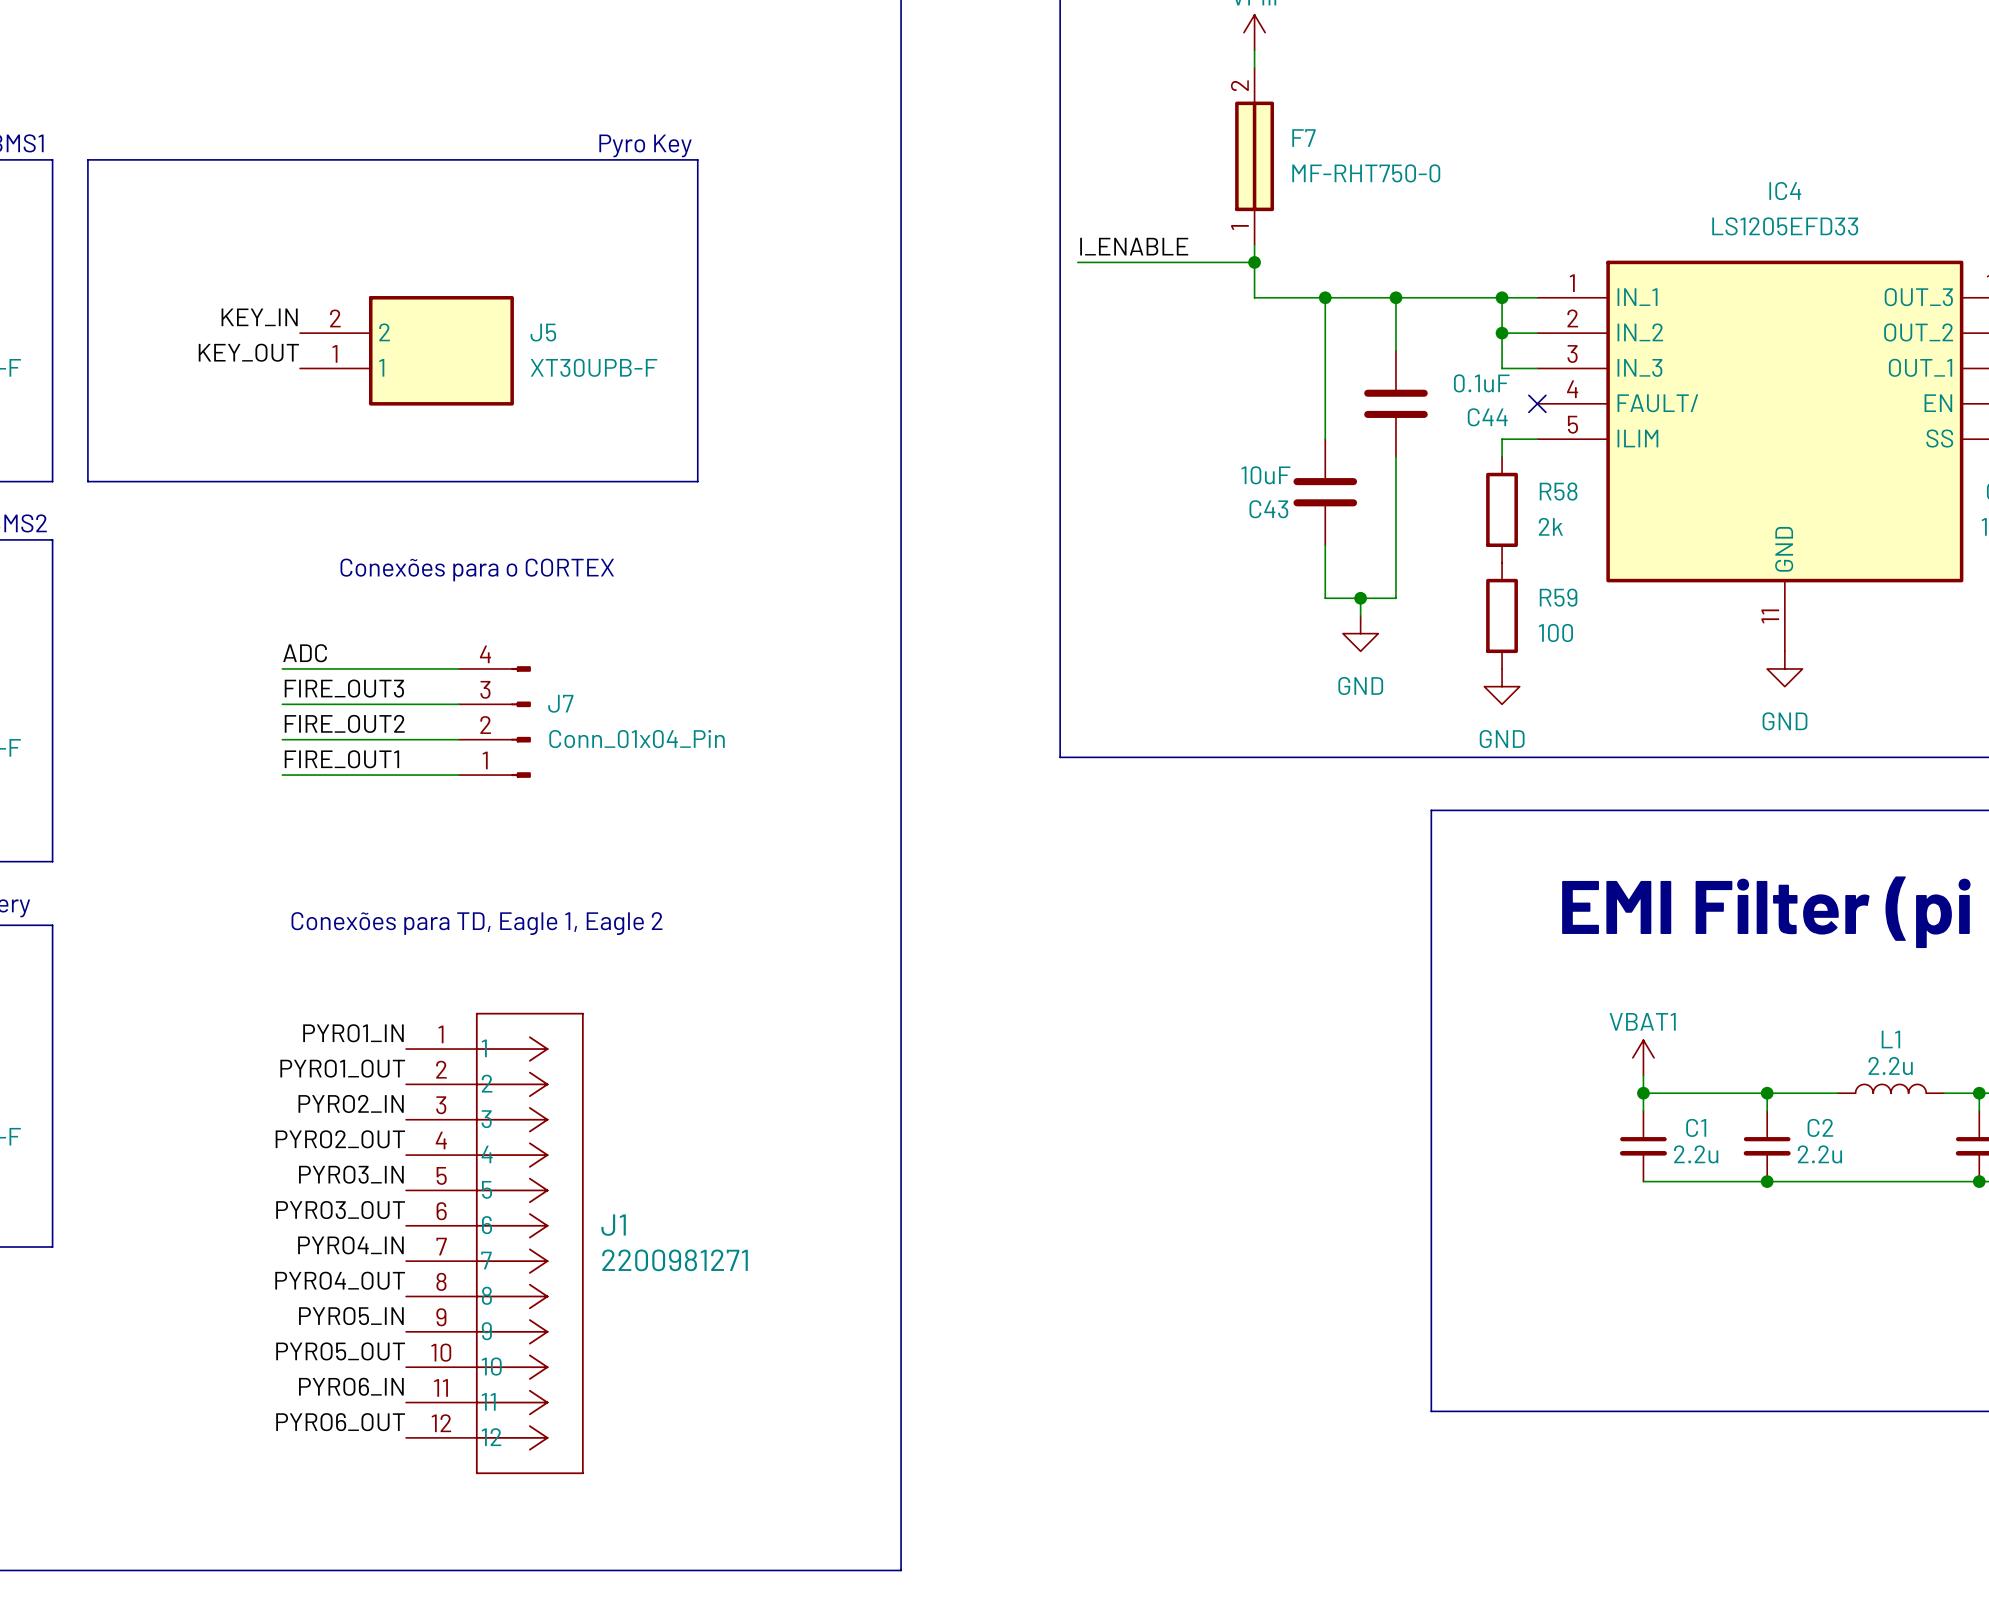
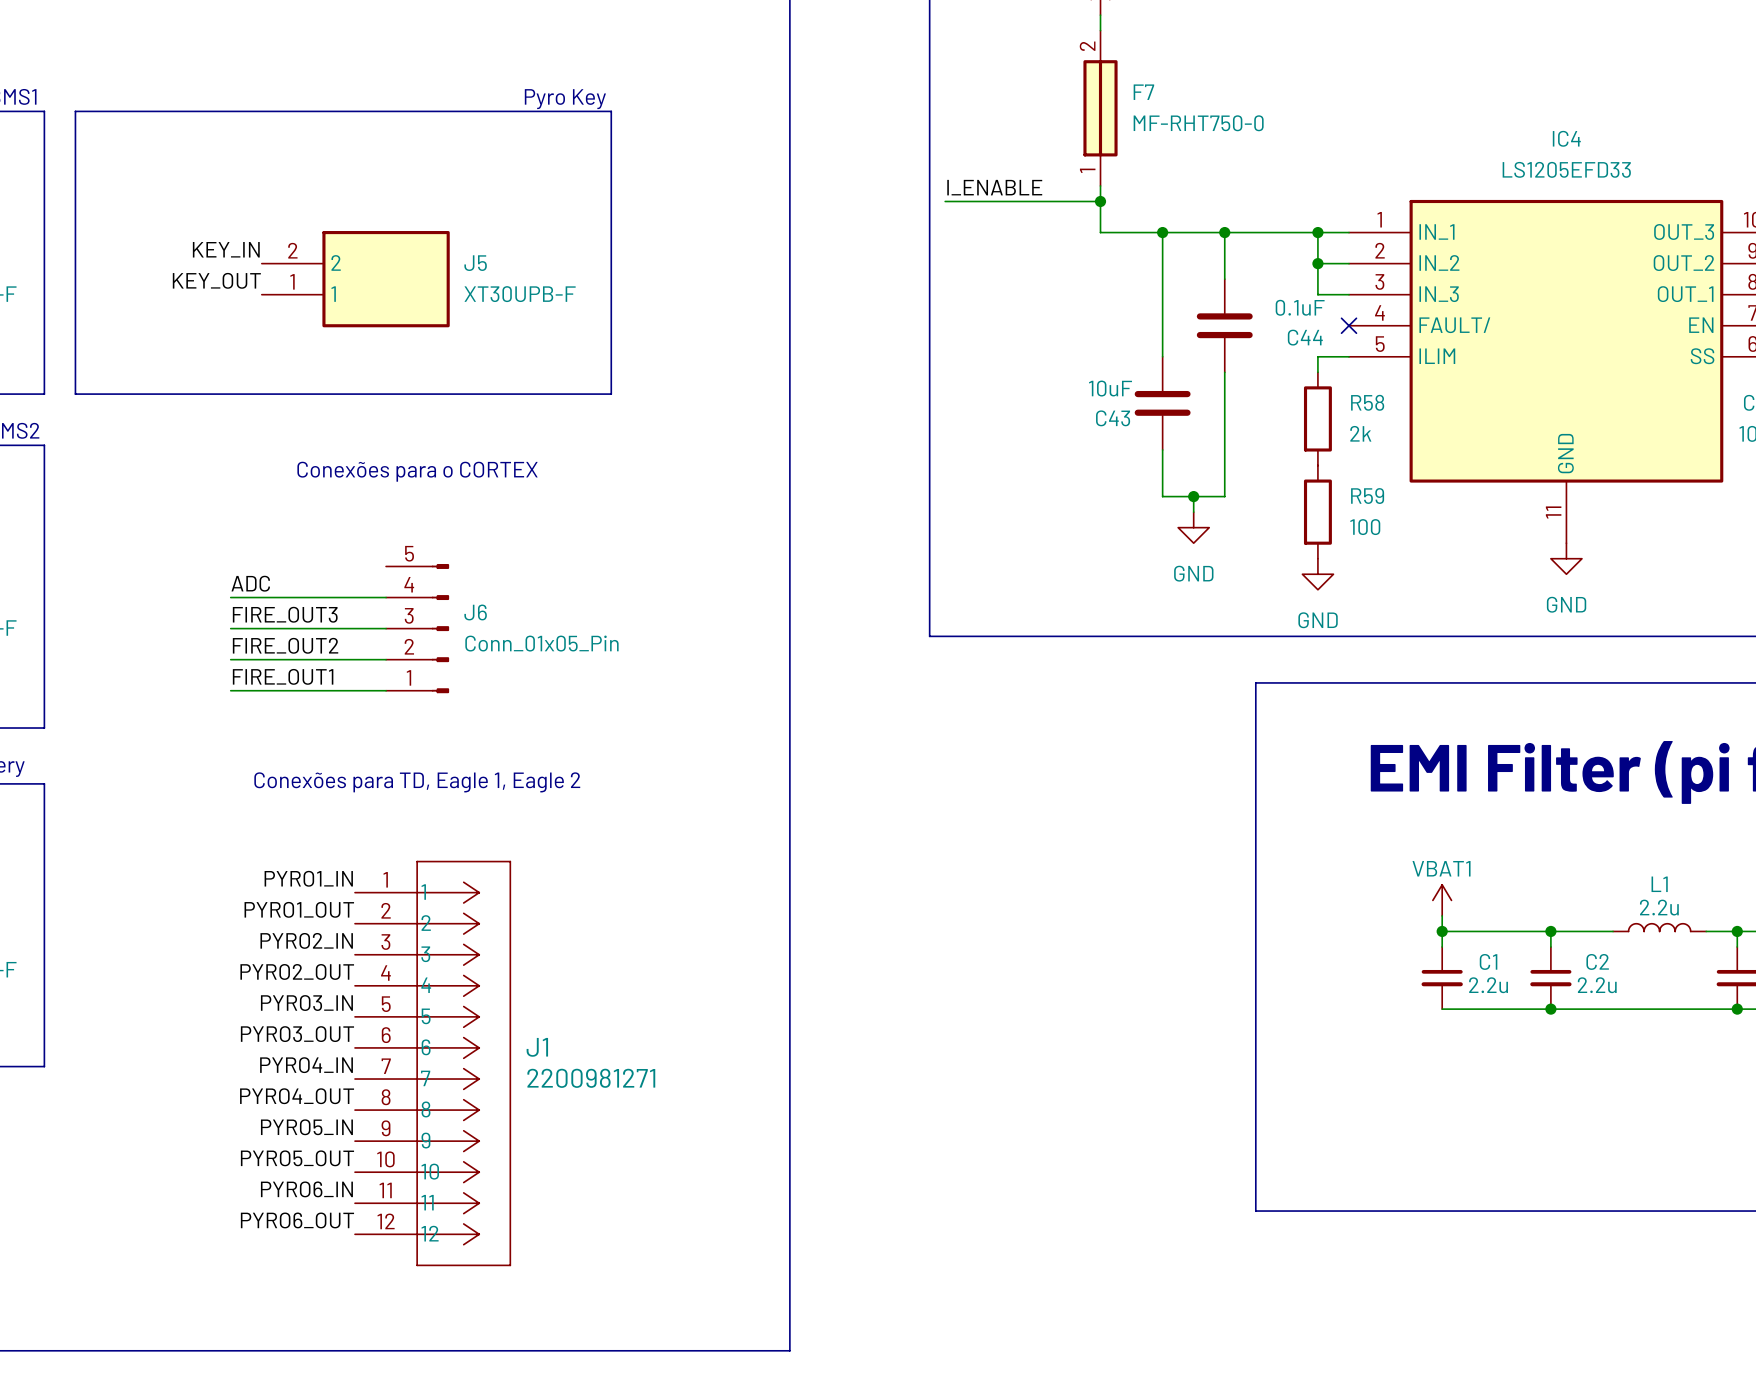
label position: ADC (305, 653) -> ADC (250, 583)
wire: (282, 668) (459, 668) -> (230, 597) (386, 597)
label position: FIRE_OUT3 (344, 688) -> FIRE_OUT3 (285, 614)
wire: (282, 704) (459, 704) -> (230, 628) (386, 628)
J7: Conn_01x04_Pin (495, 722) -> none
label position: FIRE_OUT2 (344, 723) -> FIRE_OUT2 (285, 645)
wire: (282, 739) (459, 739) -> (230, 659) (386, 659)
J6: none -> Conn_01x05_Pin (417, 628)
label position: FIRE_OUT1 (341, 759) -> FIRE_OUT1 (283, 676)
wire: (282, 775) (459, 775) -> (230, 690) (386, 690)

